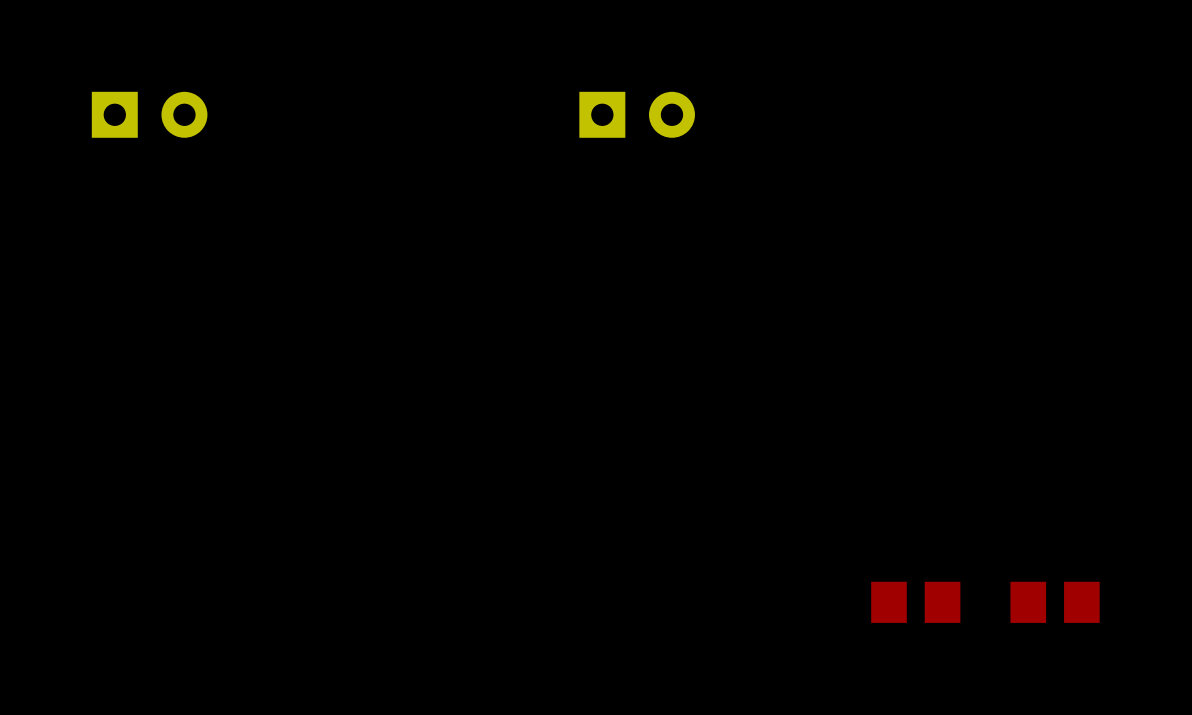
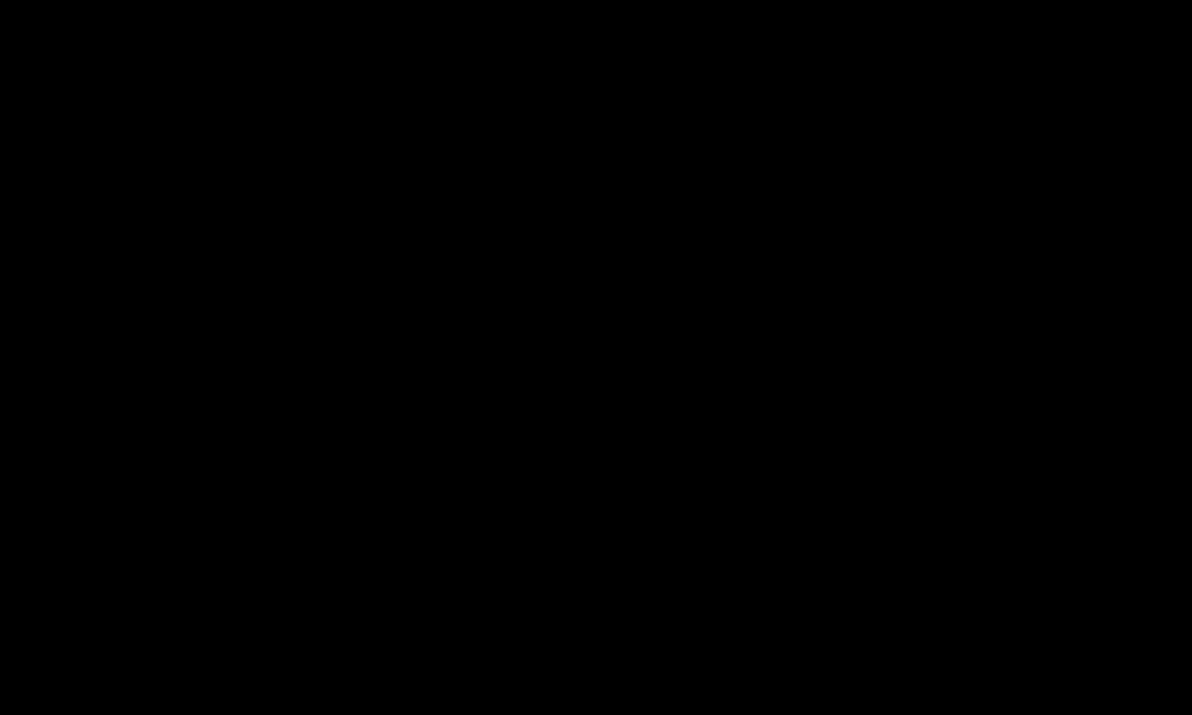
part: (149, 114) -> none
part: (637, 114) -> none
part: (915, 602) -> none
part: (1055, 602) -> none

